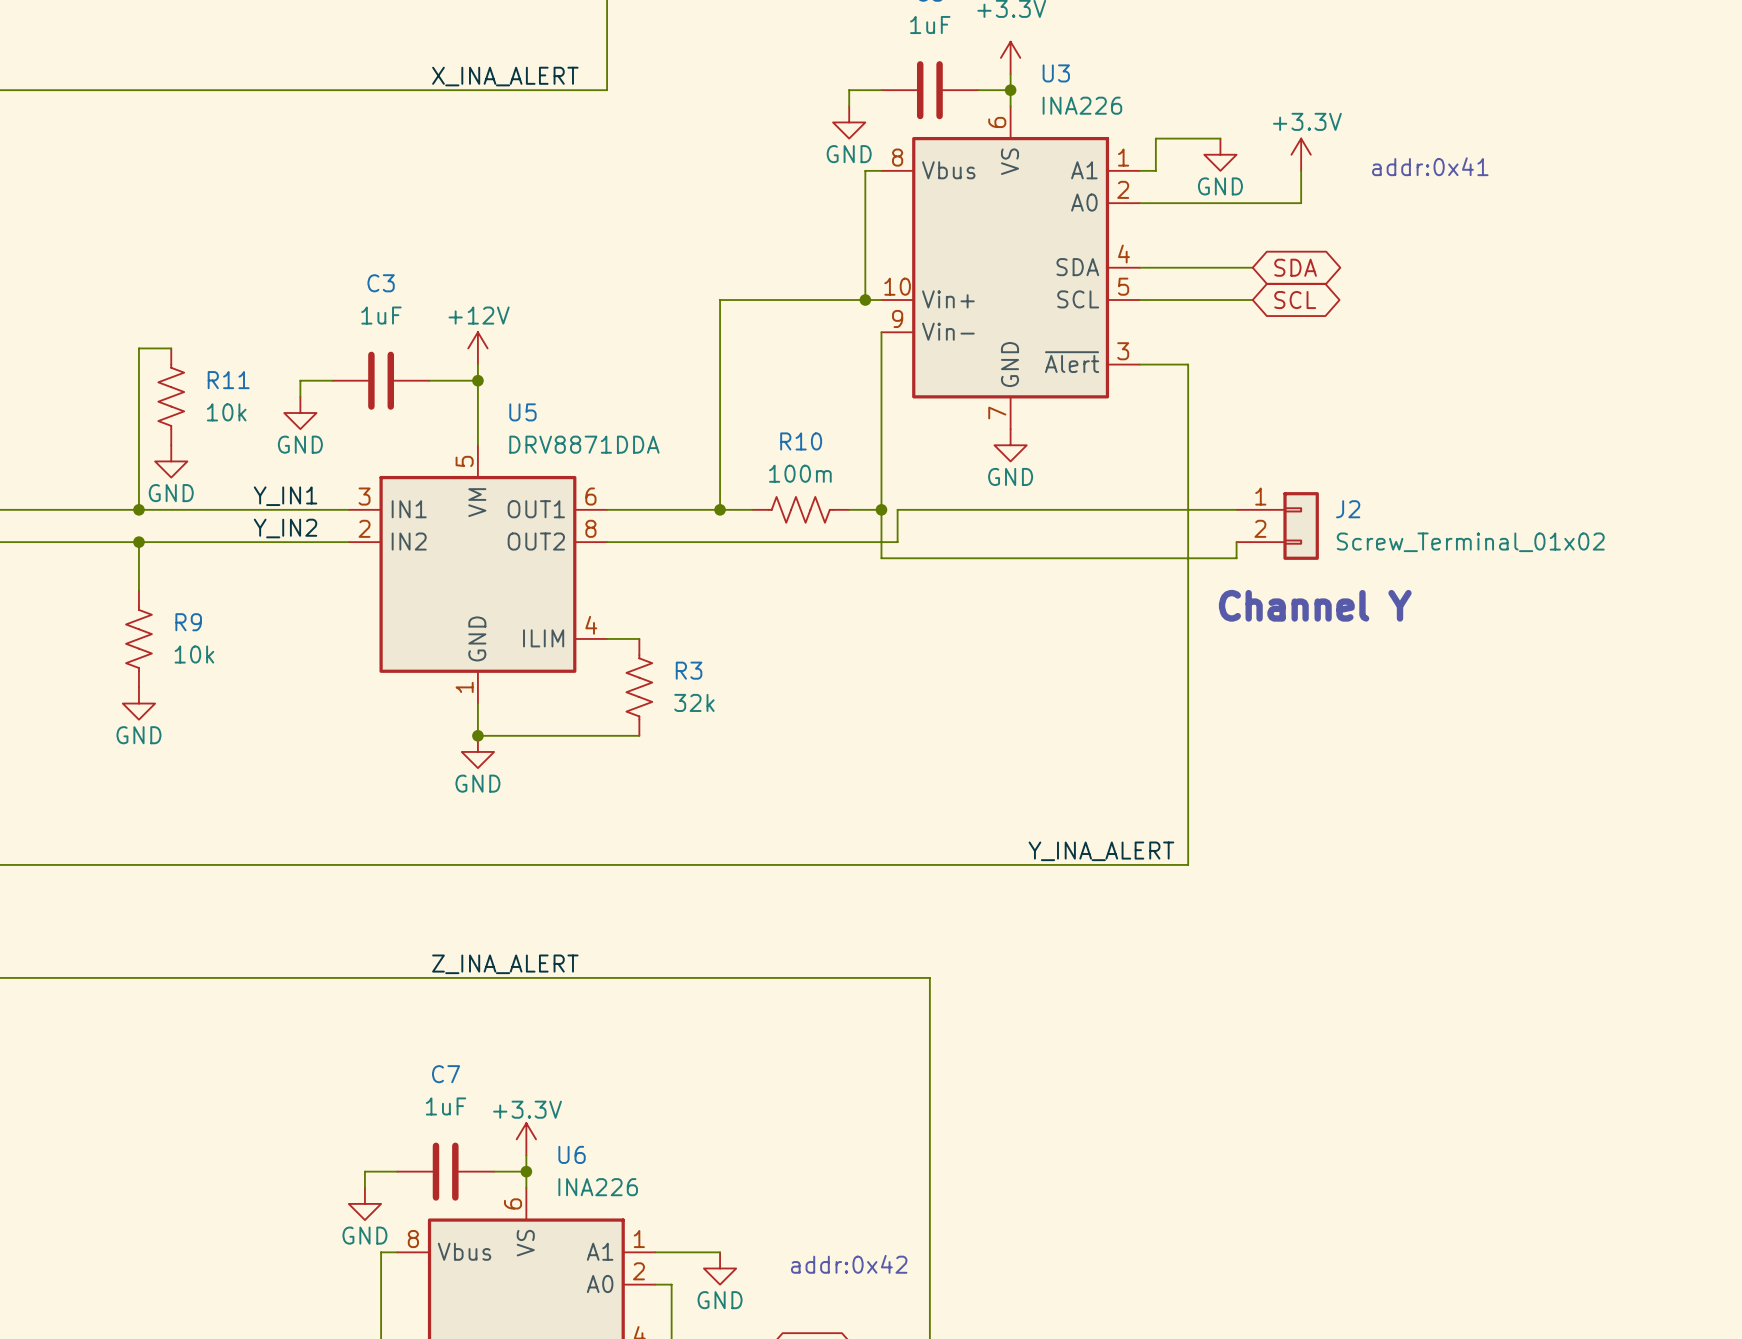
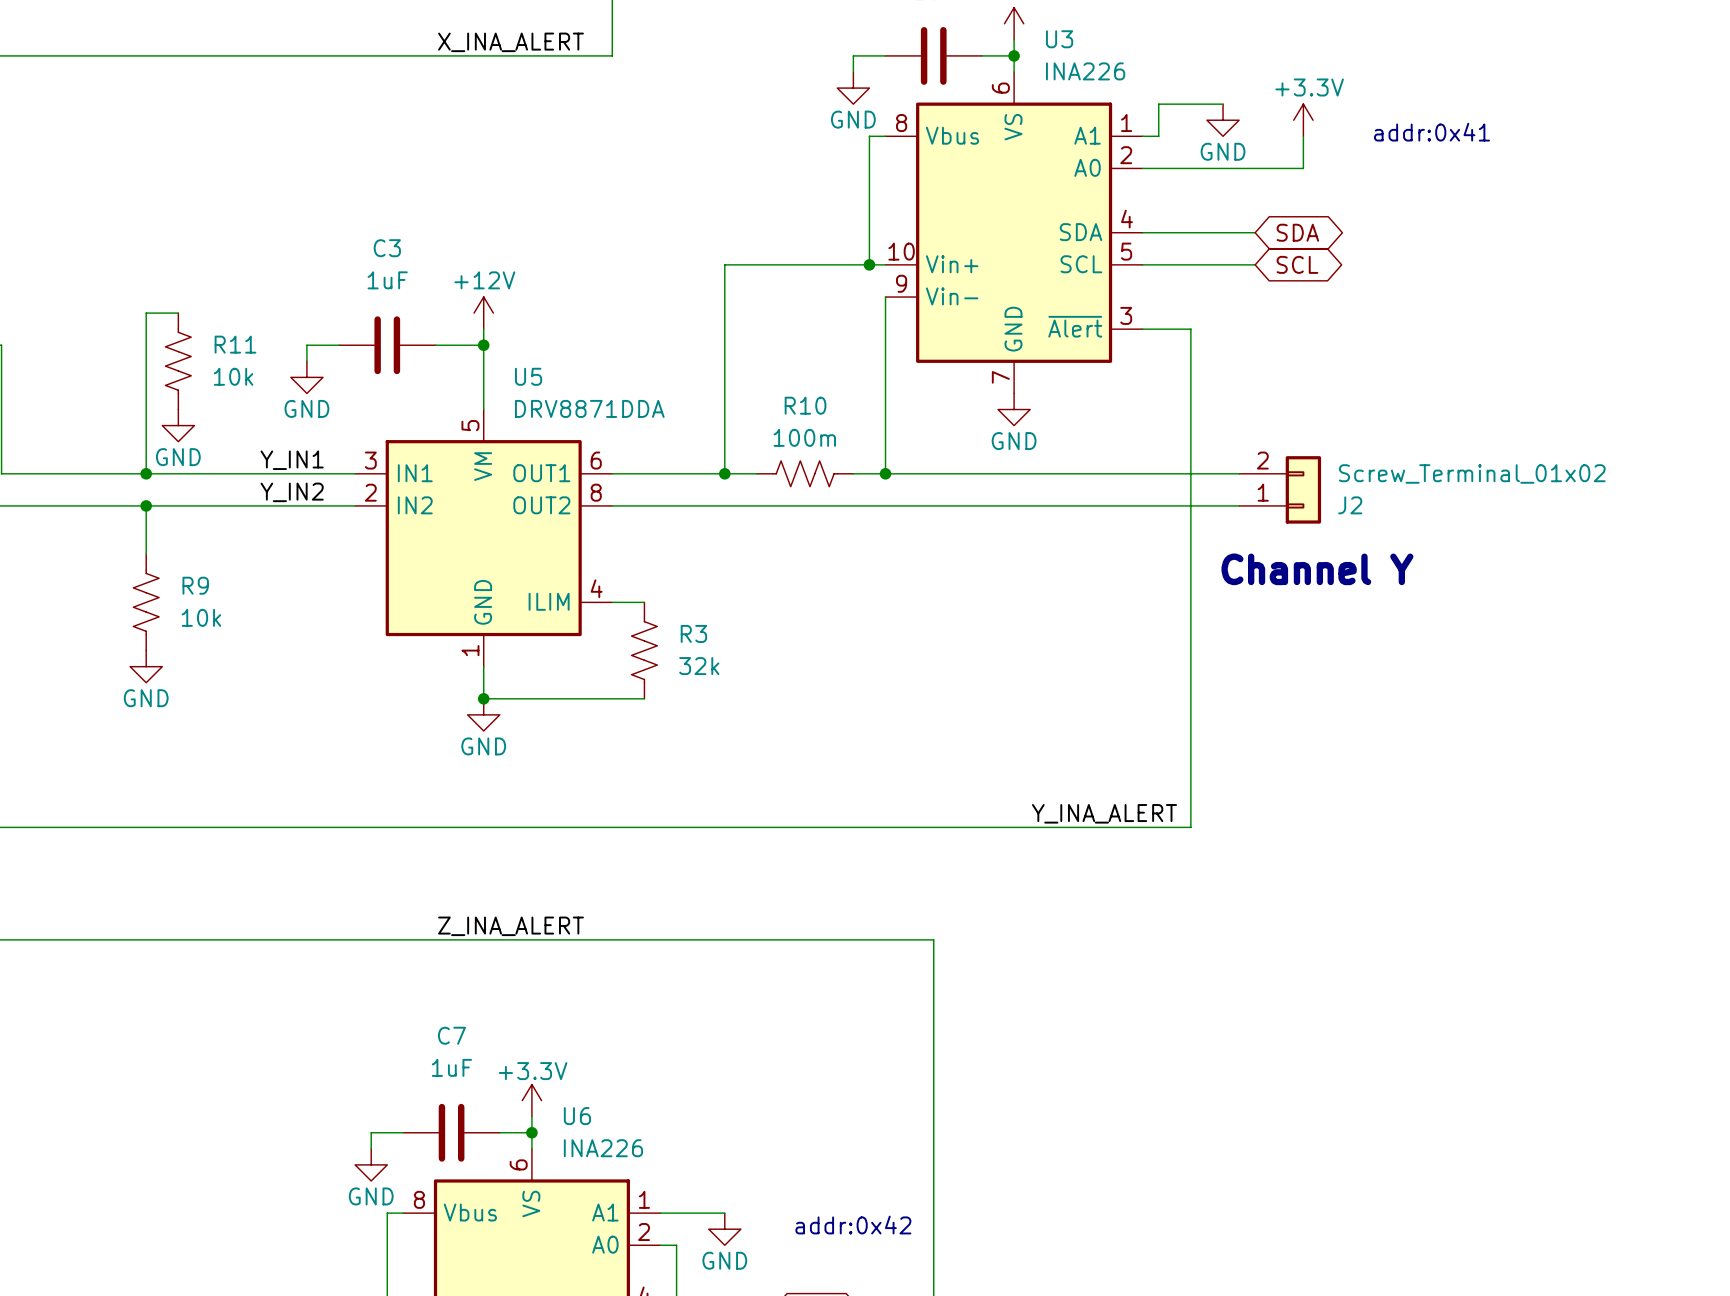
wire: (881, 509) (881, 558) (1236, 558) (1236, 542) -> (901, 505) (1239, 505)
wire: (897, 509) (897, 542) -> (901, 473) (885, 473)
J2 flip: as is (1301, 525) -> up-down (1303, 489)

